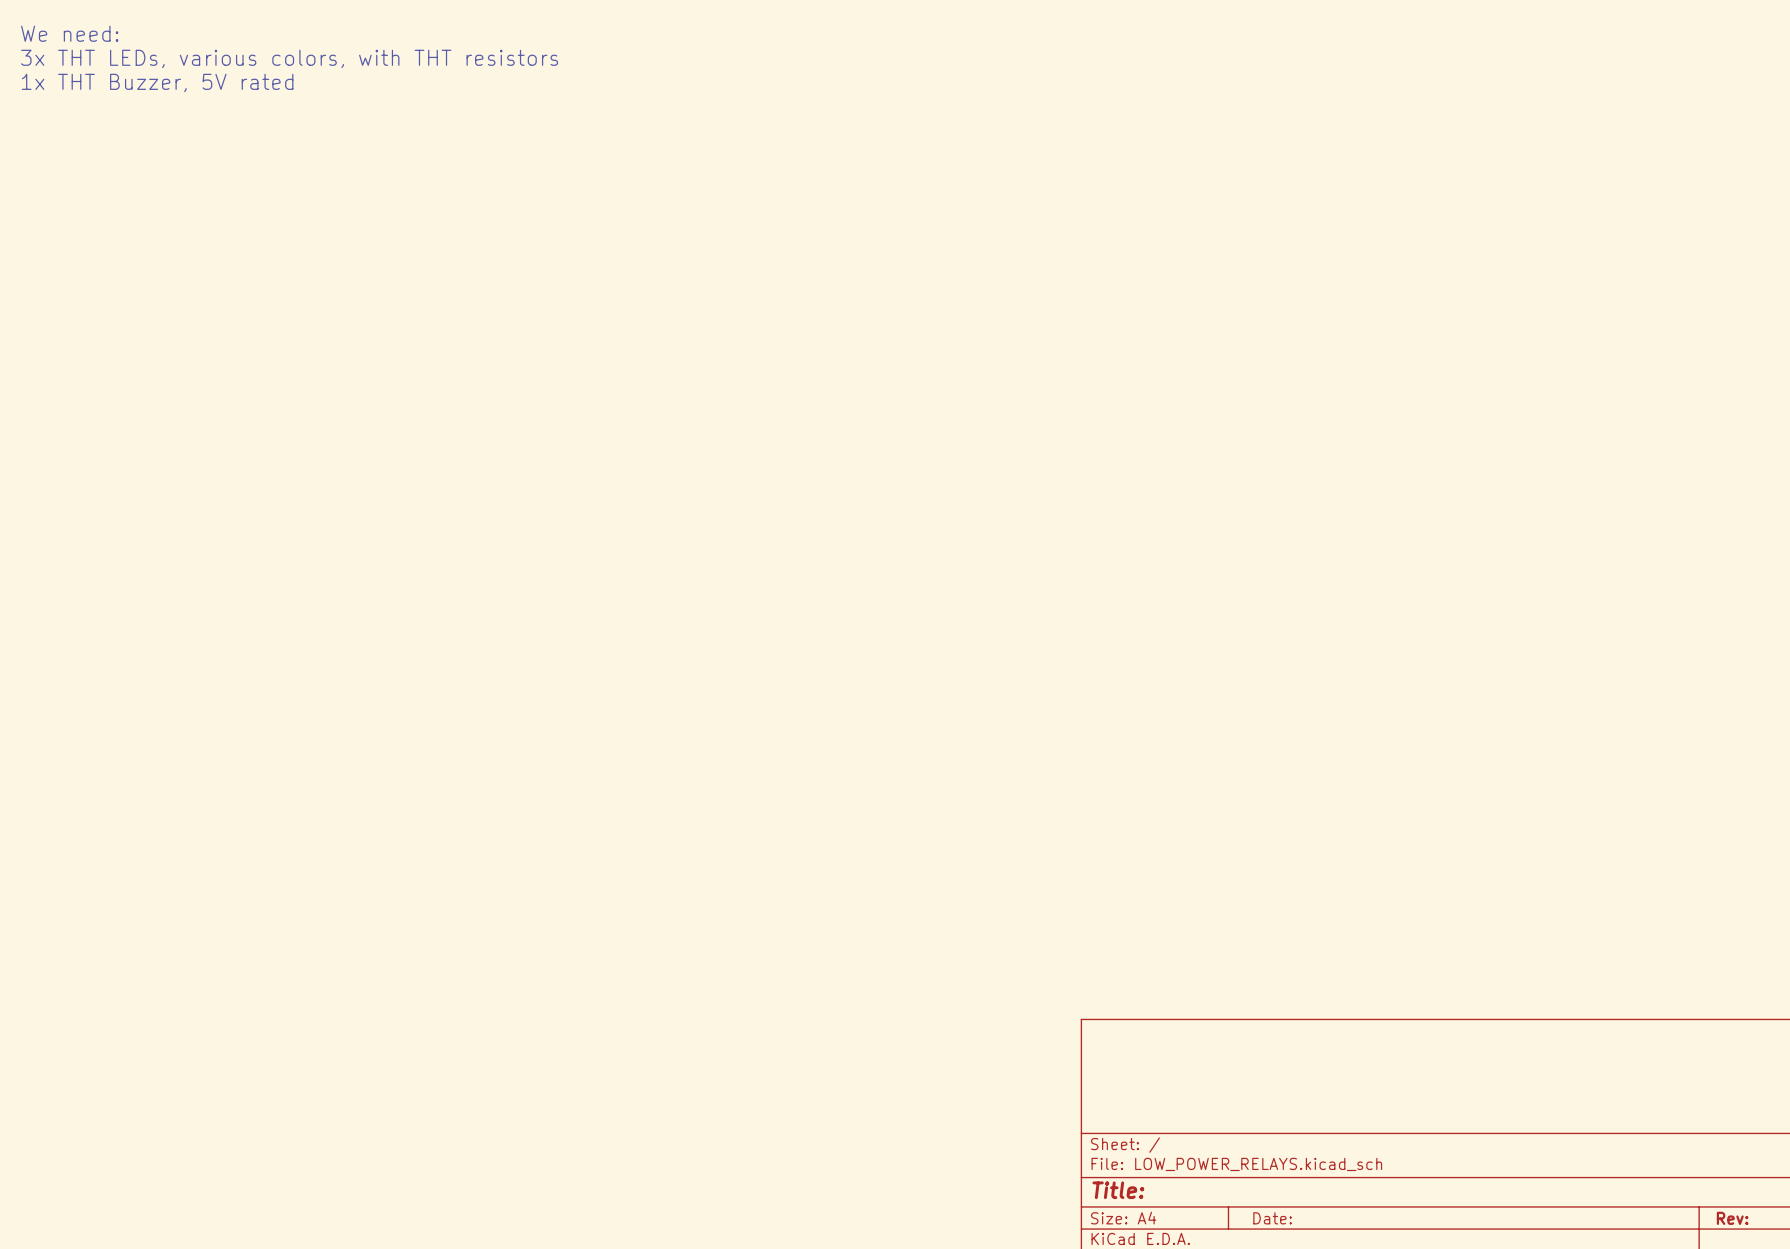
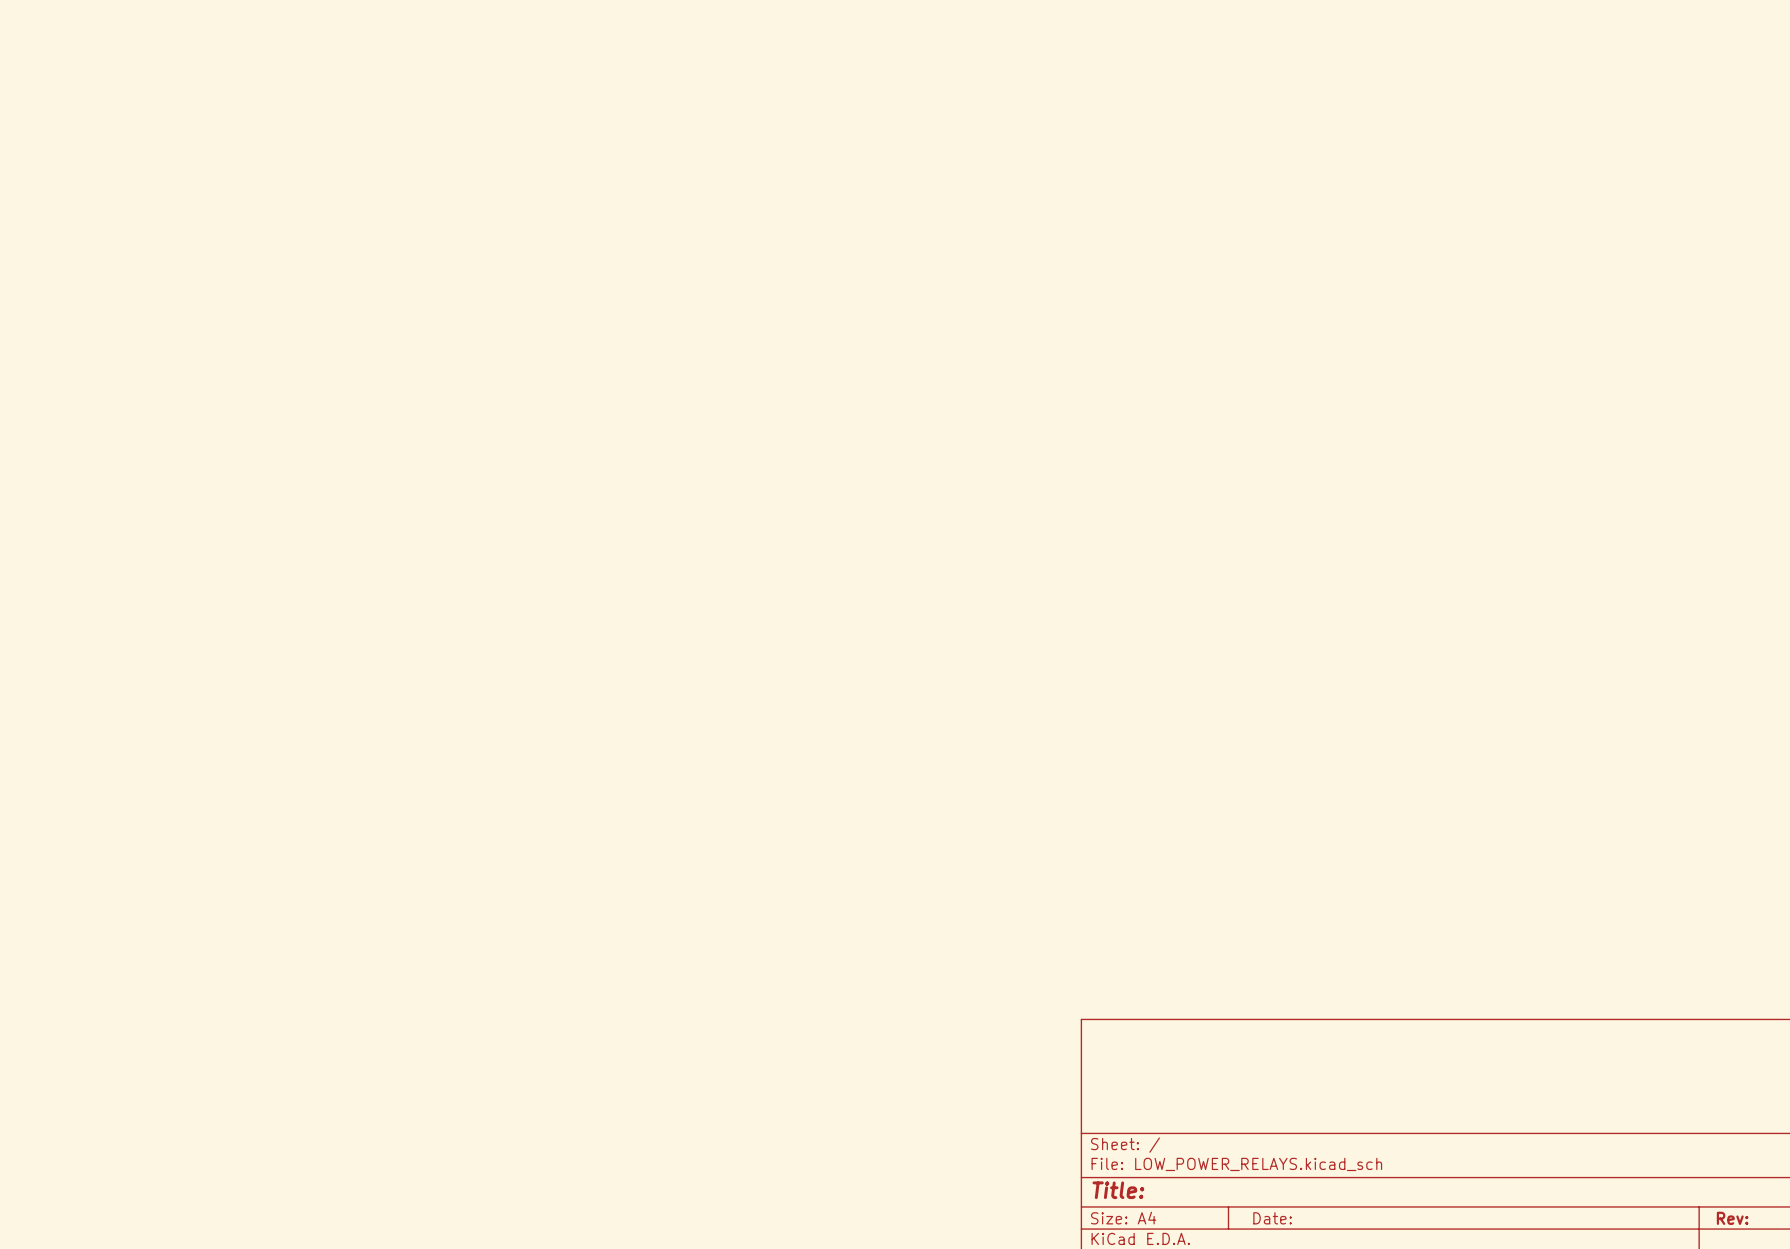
text: We need: (69, 33) -> none
text: 3x THT LEDs, various colors, with THT resistors (289, 58) -> none
text: 1x THT Buzzer, 5V rated (157, 82) -> none

